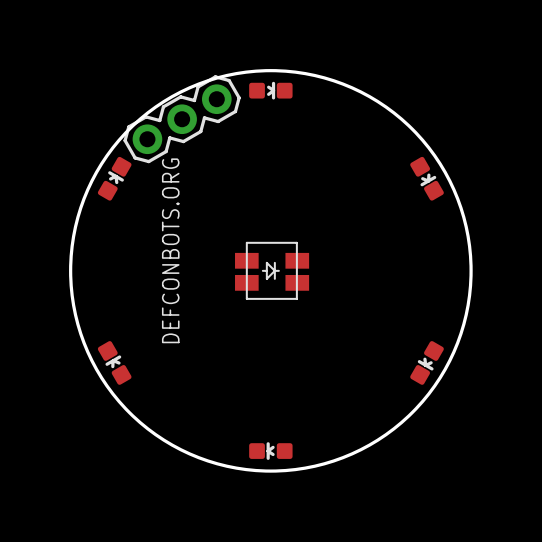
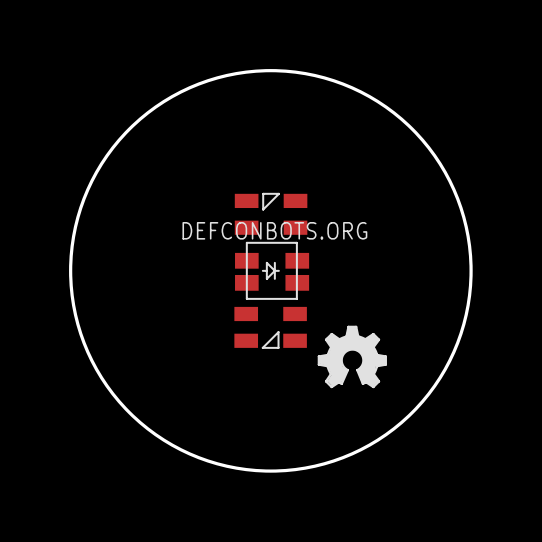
part: (270, 90) -> none
part: (182, 119) -> none
part: (114, 178) -> none
part: (427, 178) -> none
part: none -> (271, 213)
text rotation: 0° (170, 250) -> 90° clockwise (274, 230)
drawing: none -> [317, 325, 387, 389]
part: none -> (270, 327)
part: (114, 362) -> none
part: (427, 362) -> none
part: (270, 451) -> none

